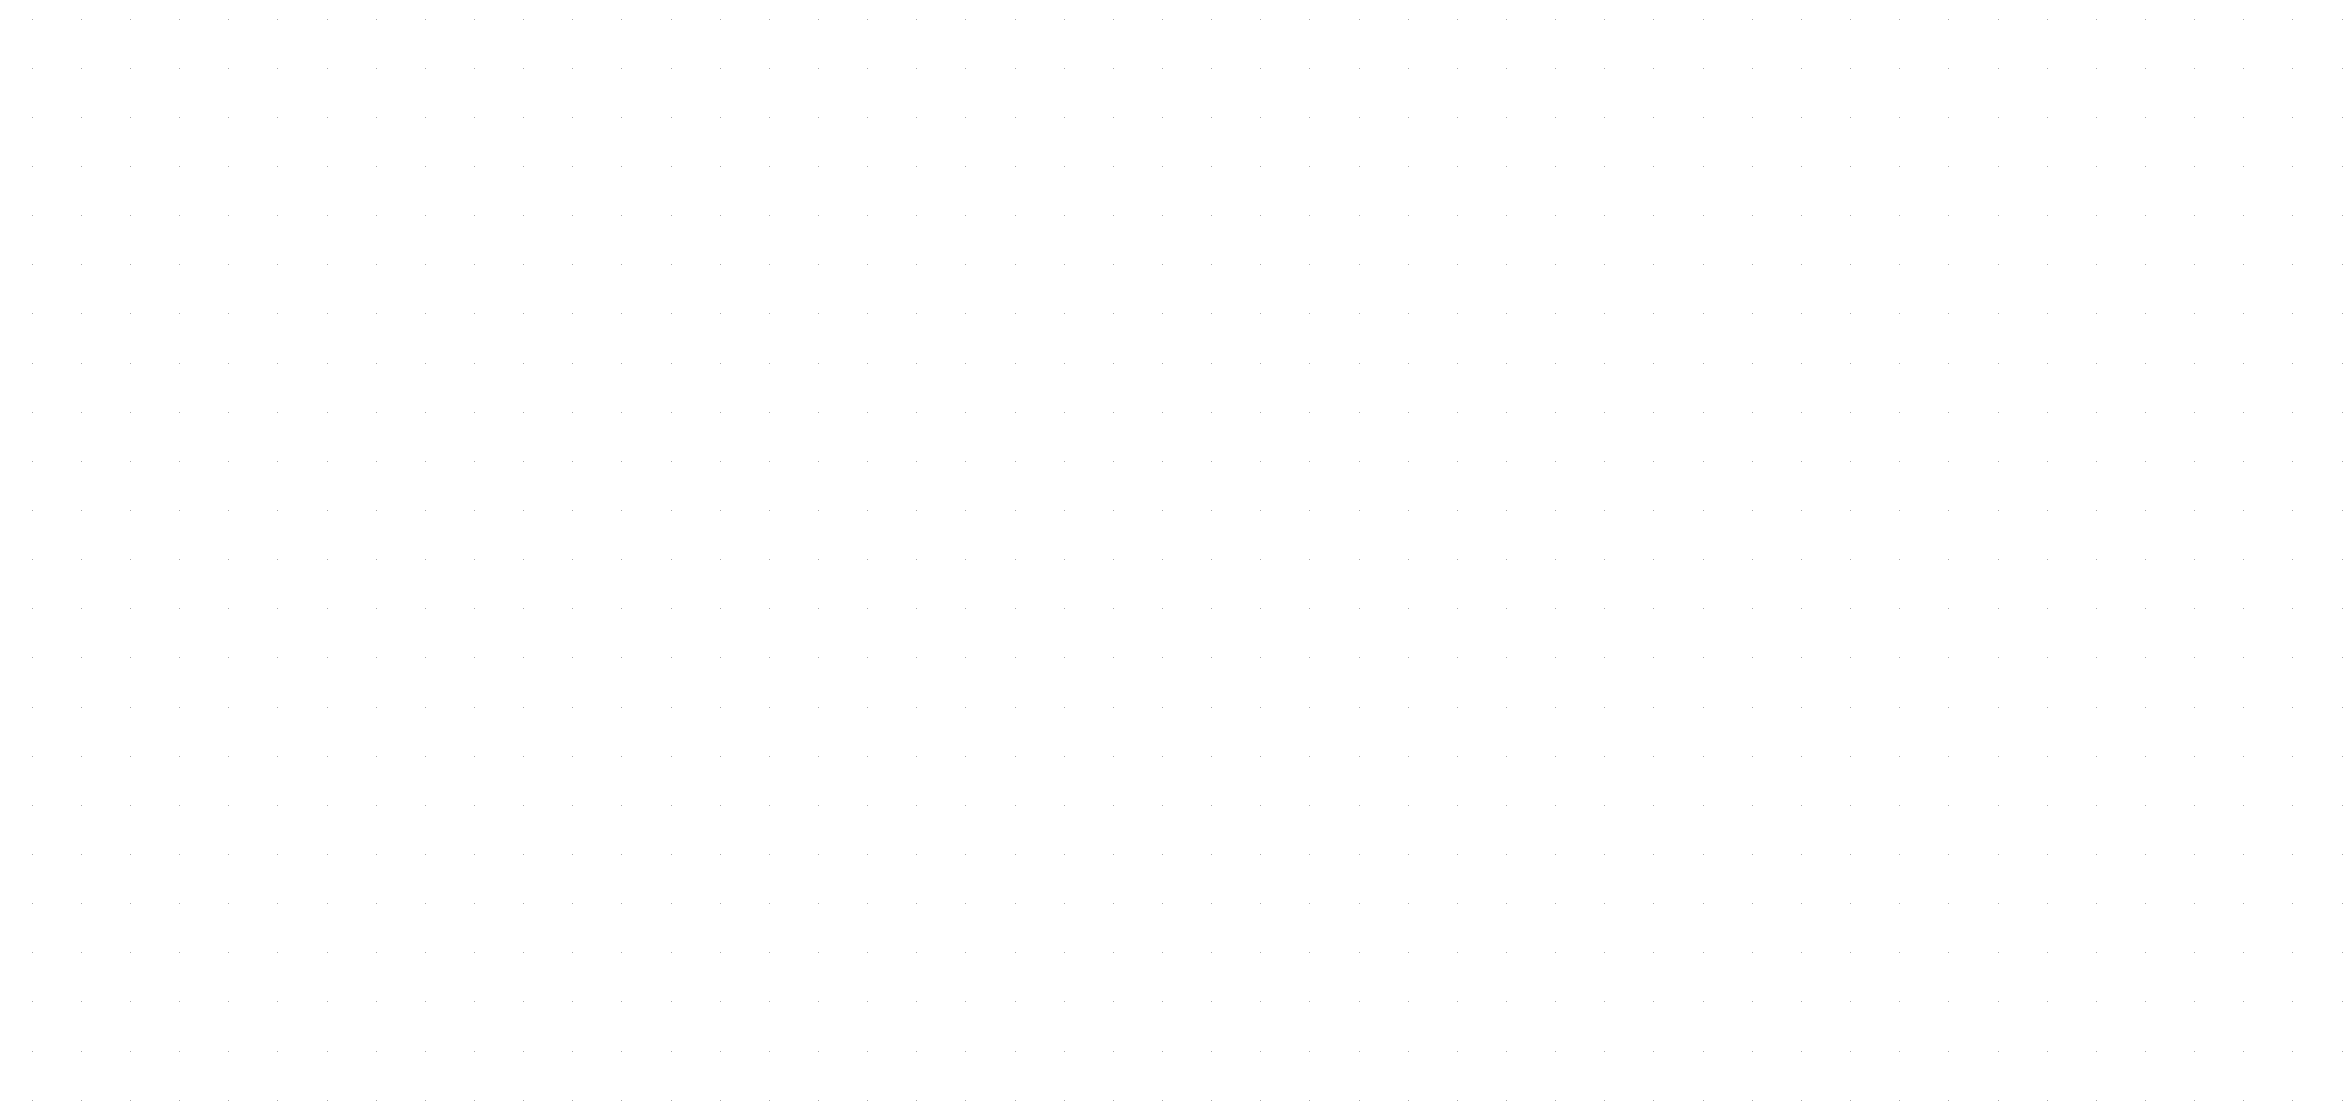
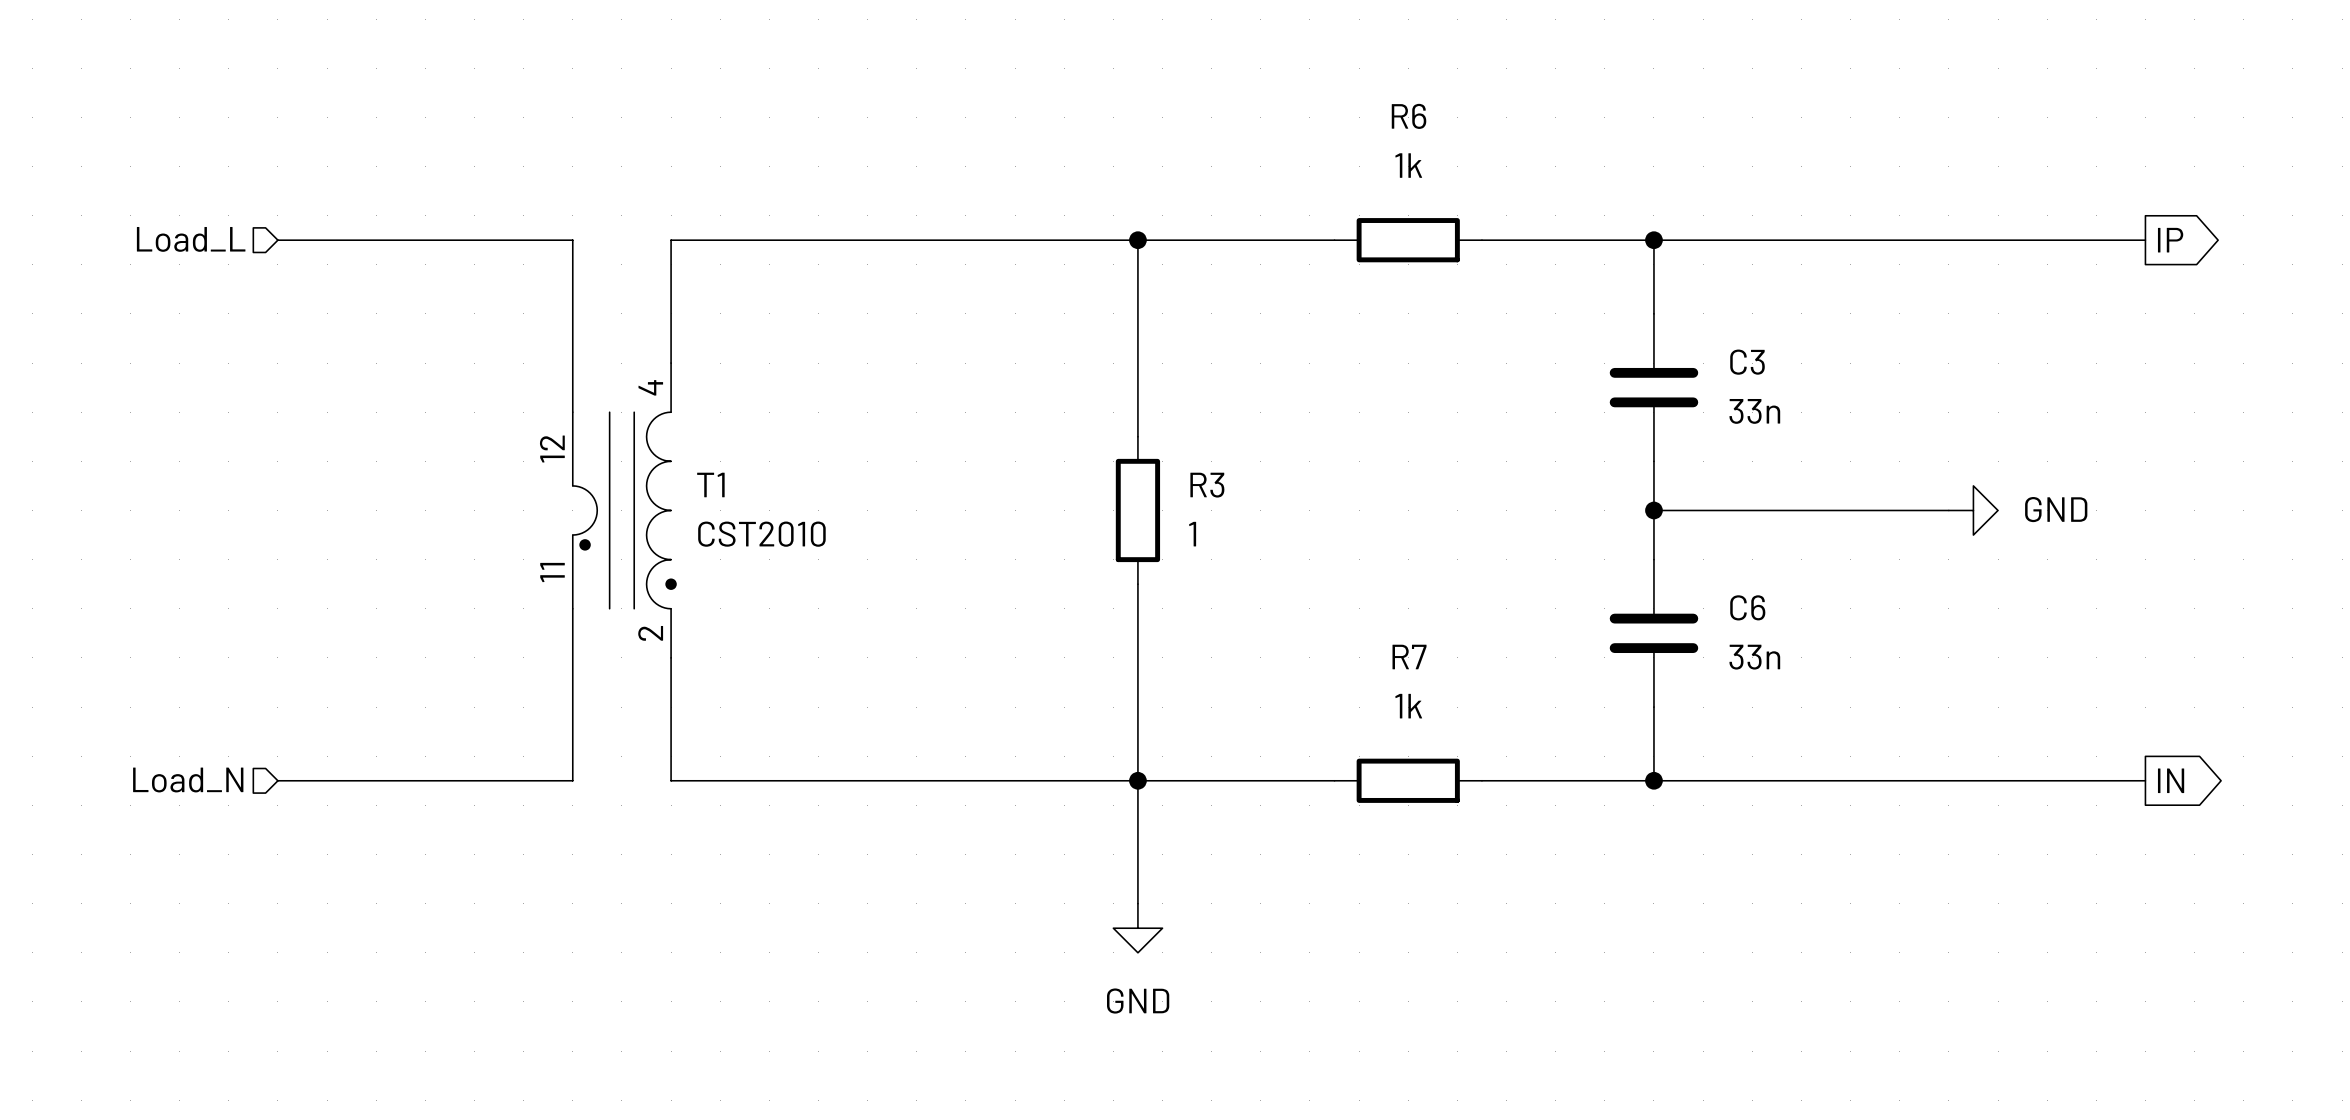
hierarchical label: none -> Load_L (191, 239)
wire: none -> (277, 240) (572, 240) (572, 412)
wire: none -> (1137, 240) (1137, 436)
junction: none -> (1137, 240)
wire: none -> (1334, 240) (671, 240) (671, 363)
R6: none -> 1k (1408, 240)
wire: none -> (1481, 240) (2145, 240)
wire: none -> (1653, 240) (1653, 313)
junction: none -> (1653, 240)
global label: none -> IP (2170, 240)
C3: none -> 33n (1653, 387)
wire: none -> (1653, 461) (1653, 559)
T1: none -> CST2010 (624, 510)
R3: none -> 1 (1137, 510)
wire: none -> (1653, 510) (1948, 510)
junction: none -> (1653, 510)
power symbol: none -> GND (1973, 510)
wire: none -> (1137, 584) (1137, 903)
wire: none -> (572, 608) (572, 780) (277, 780)
C6: none -> 33n (1653, 633)
wire: none -> (671, 657) (671, 780) (1334, 780)
wire: none -> (1653, 707) (1653, 780)
hierarchical label: none -> Load_N (188, 780)
junction: none -> (1137, 780)
R7: none -> 1k (1408, 780)
wire: none -> (1481, 780) (2145, 780)
junction: none -> (1653, 780)
global label: none -> IN (2171, 780)
power symbol: none -> GND (1137, 928)

